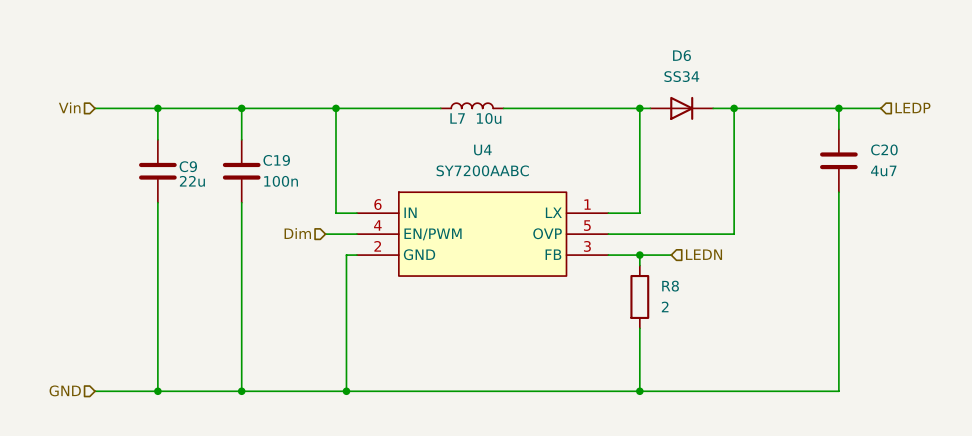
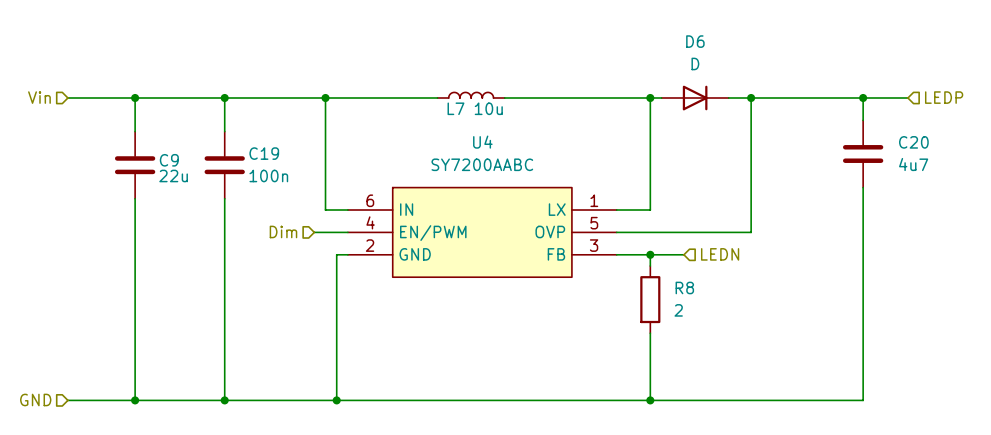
D6 value: SS34 (681, 76) -> D (695, 63)

